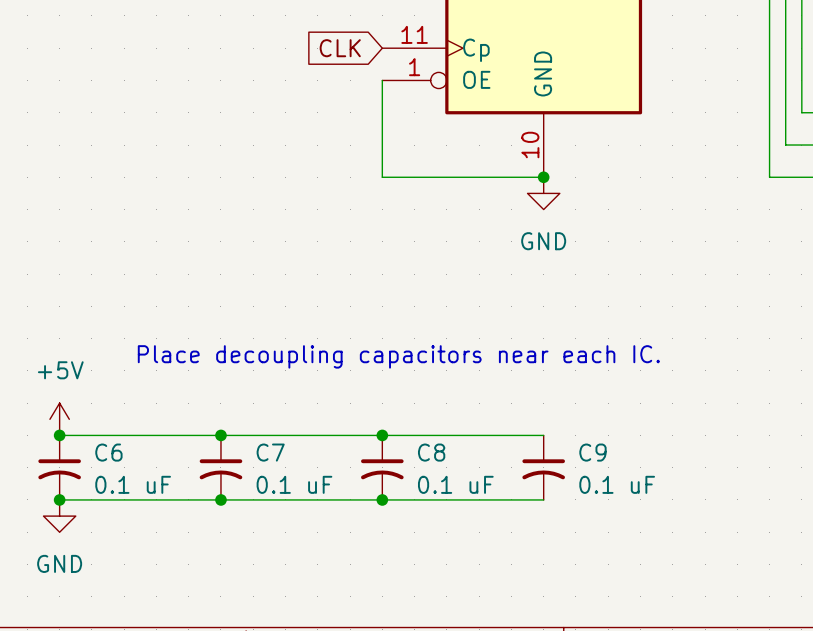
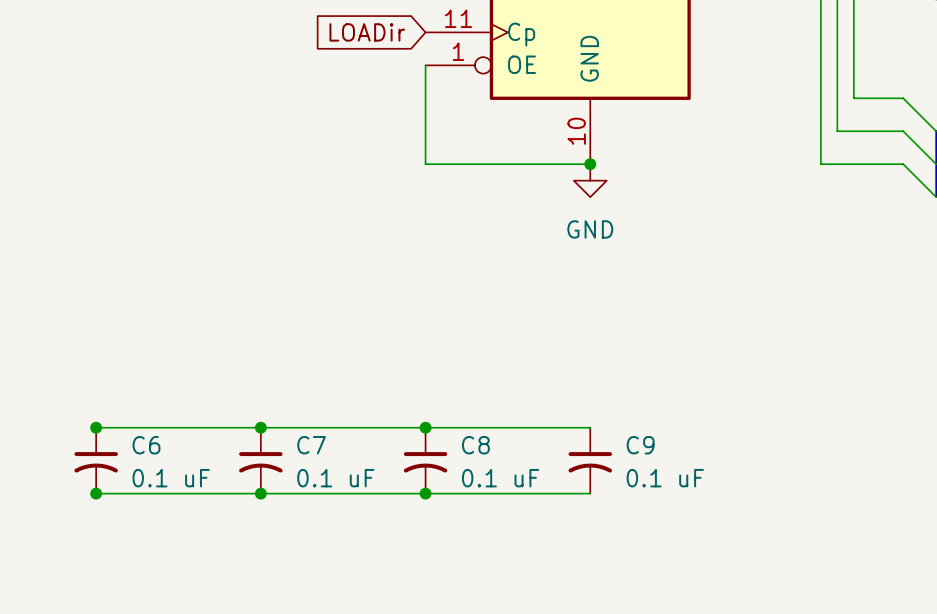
global label: CLK (340, 48) -> LOADir (367, 32)
text: Place decoupling capacitors near each IC. (398, 356) -> none
power symbol: +5V (59, 419) -> none
power symbol: GND (59, 516) -> none

